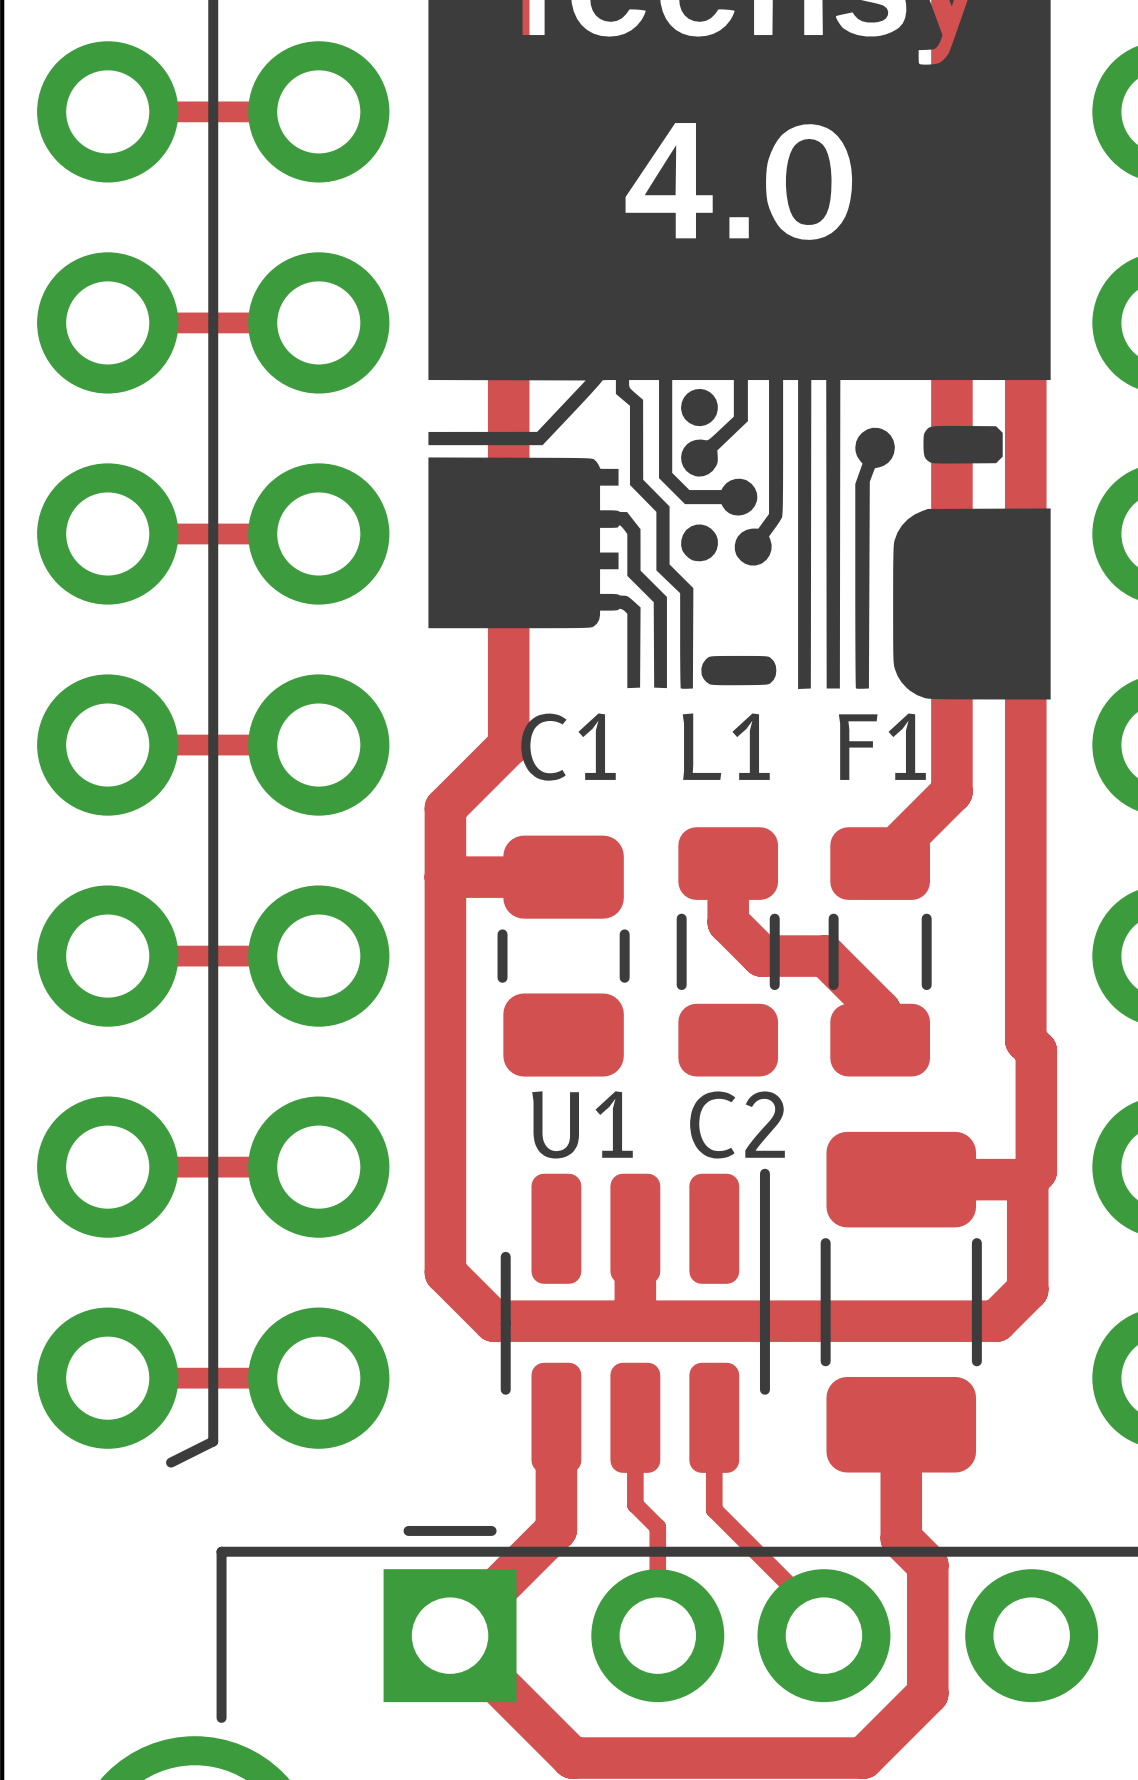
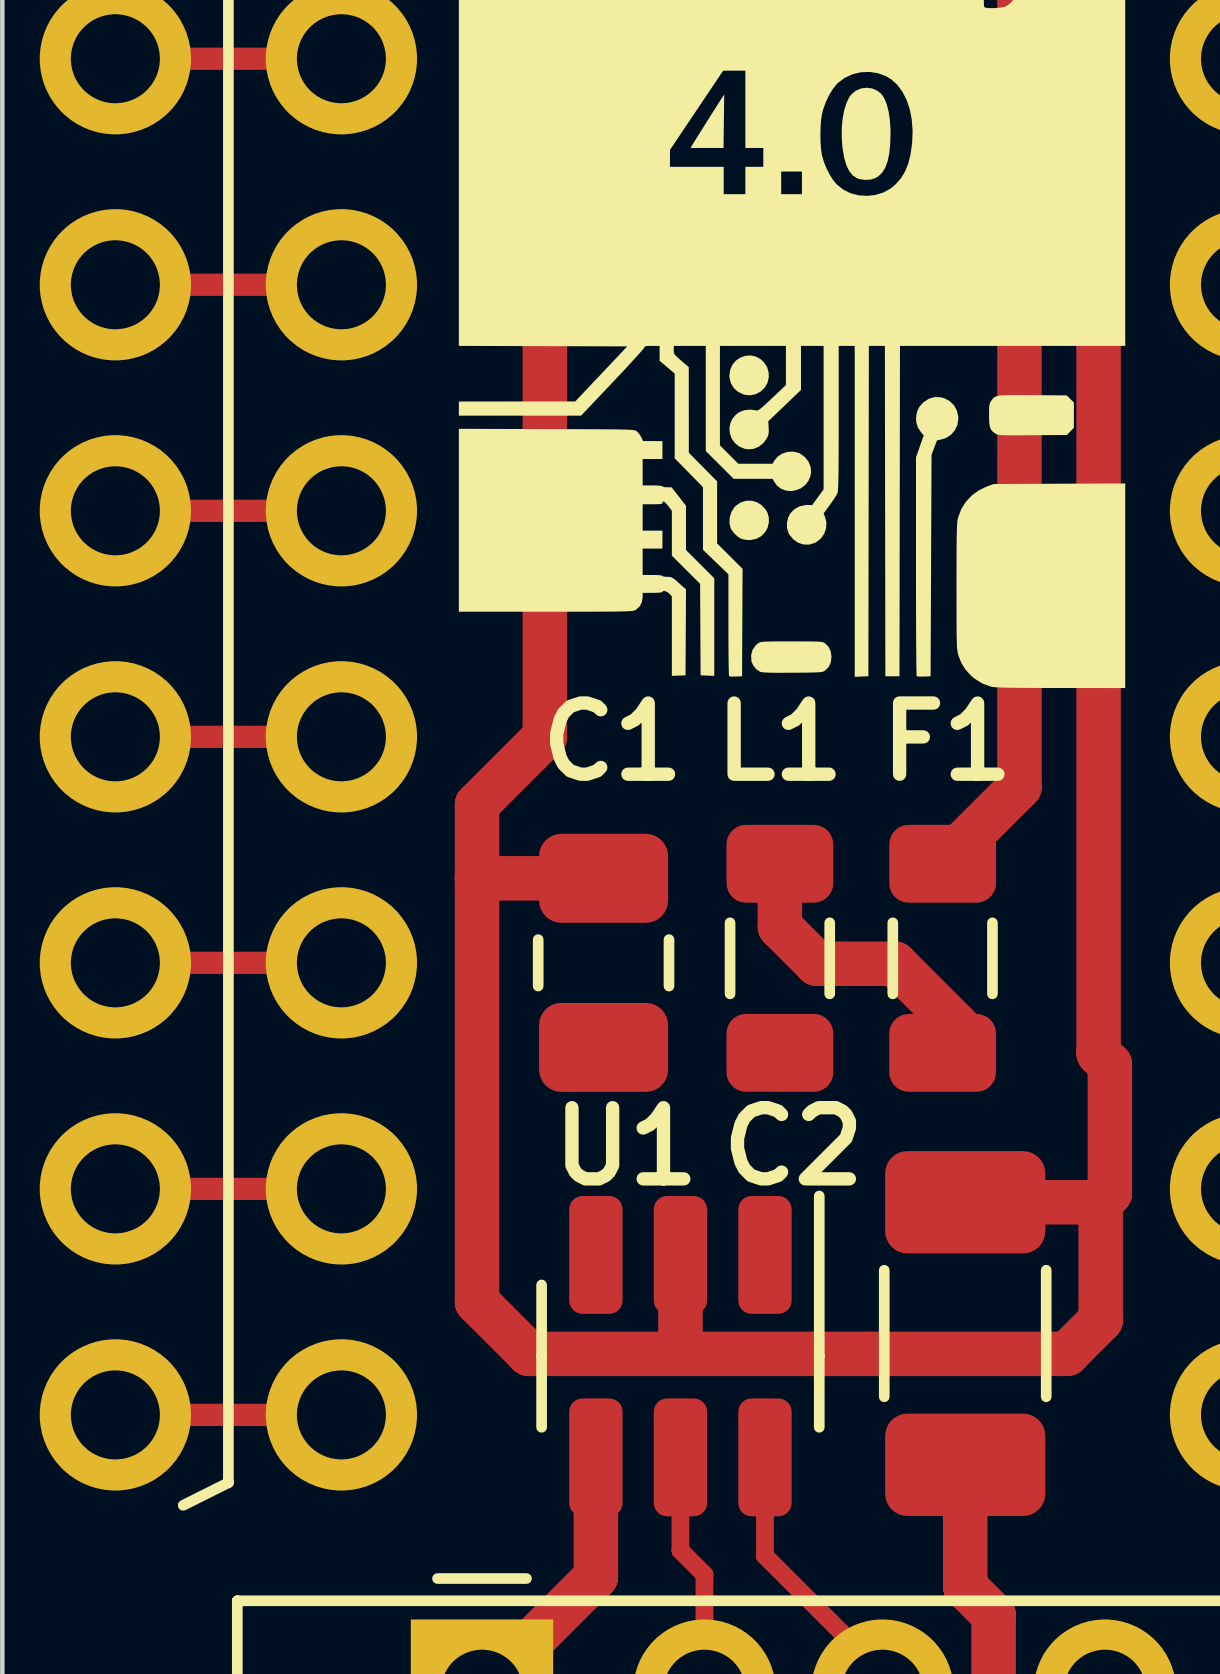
track: (761, 956) (825, 956) (880, 1010) (880, 1040) -> (816, 963) (894, 963) (957, 1026) (957, 1047)

